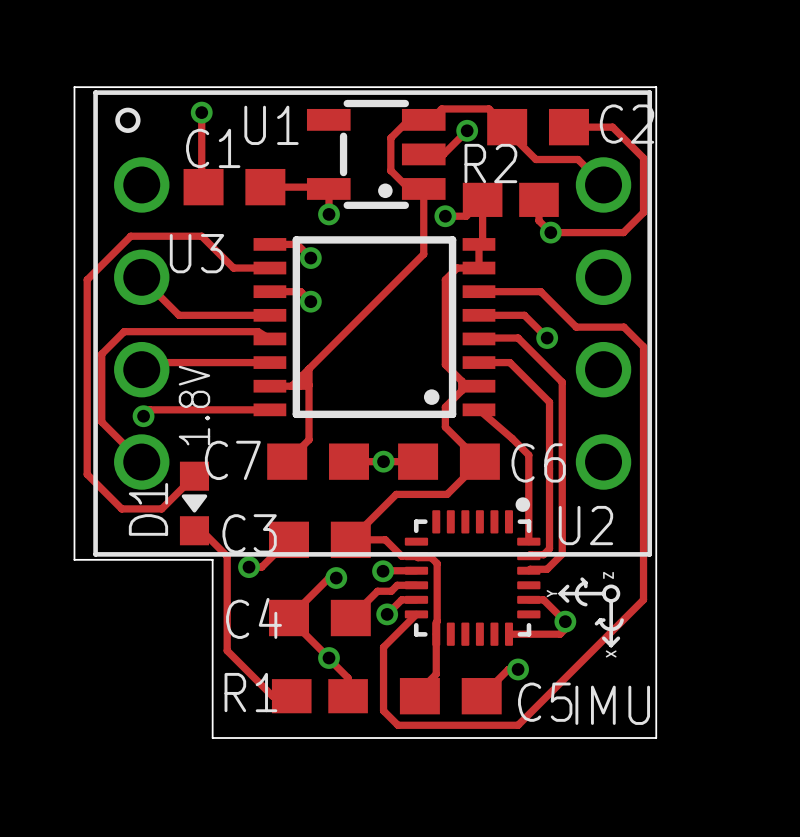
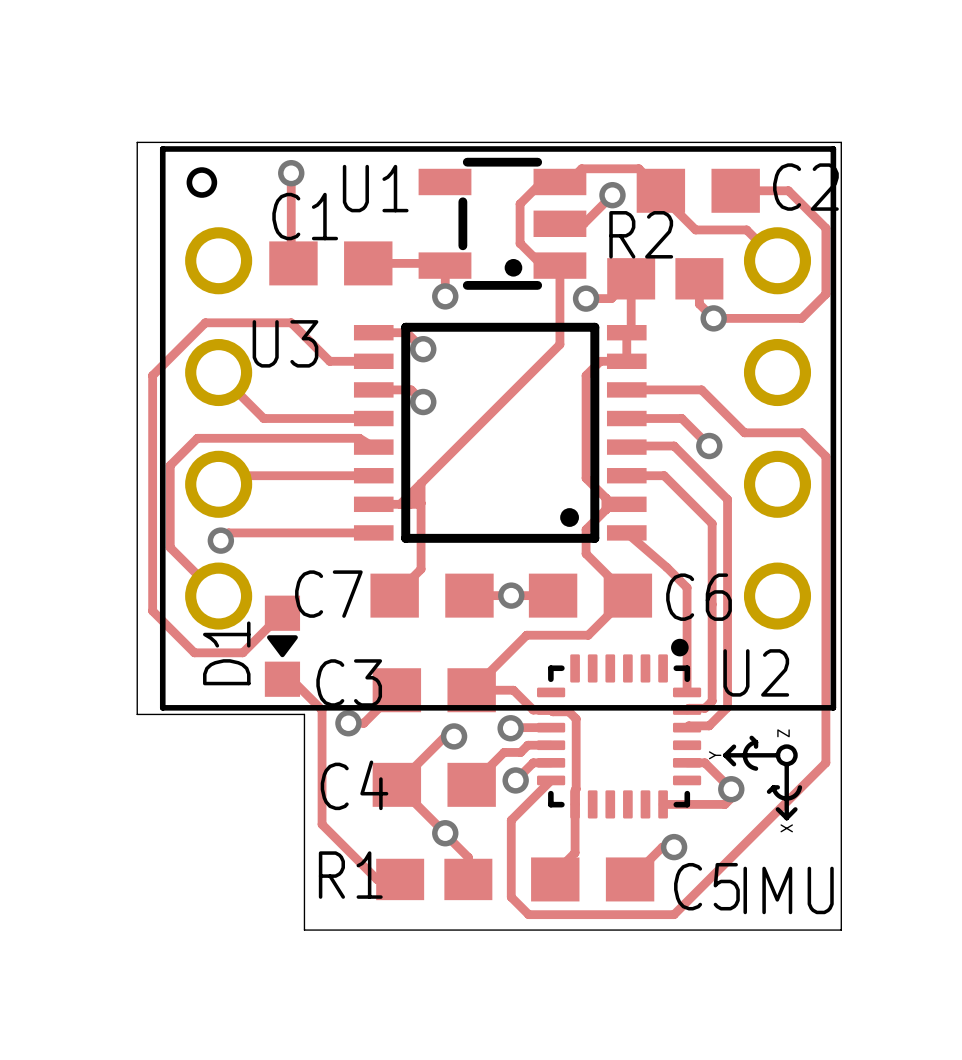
text: 1.8V (194, 405) -> none

